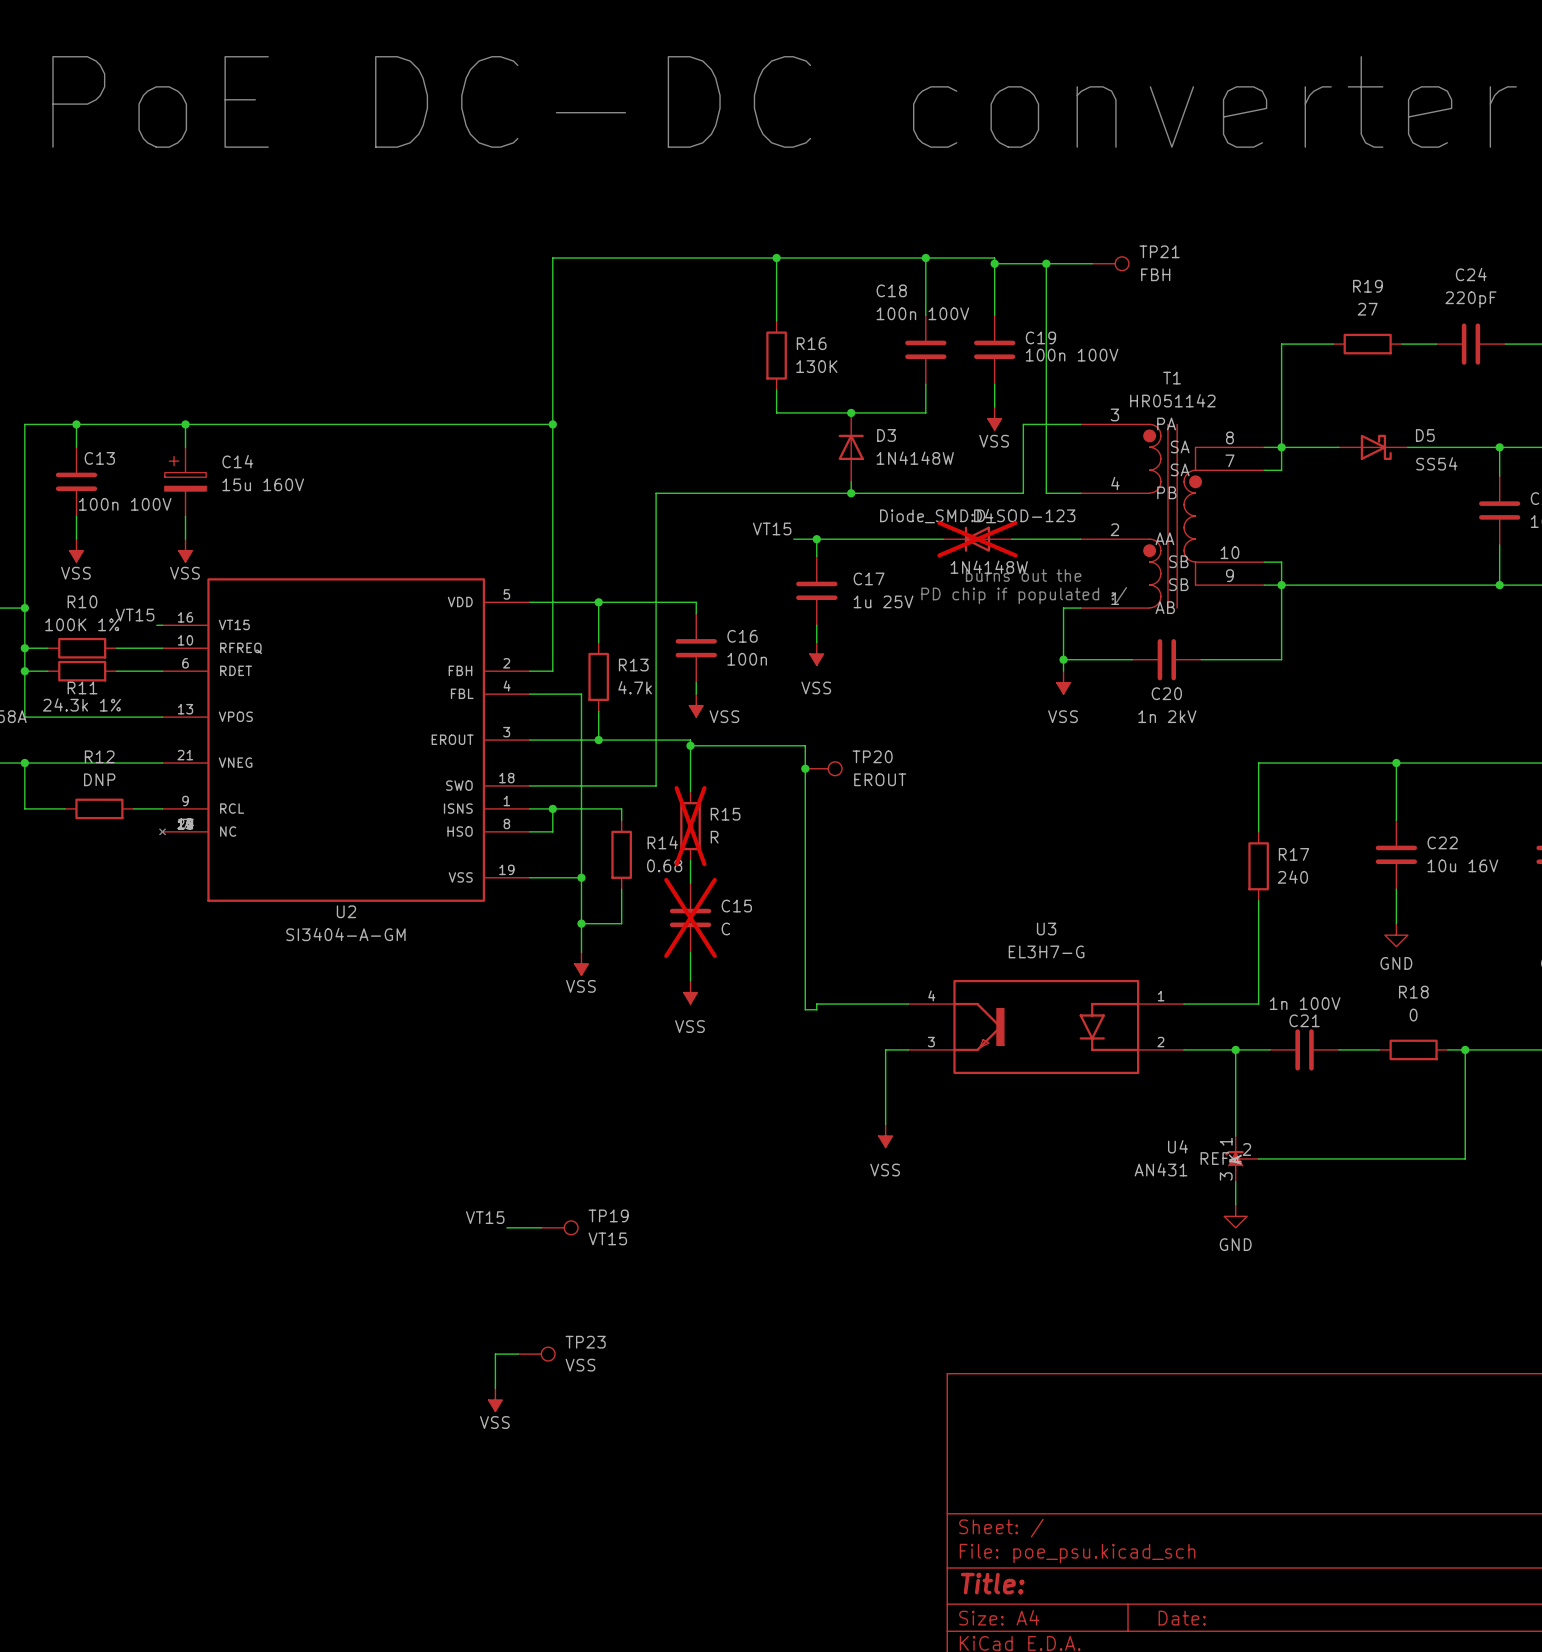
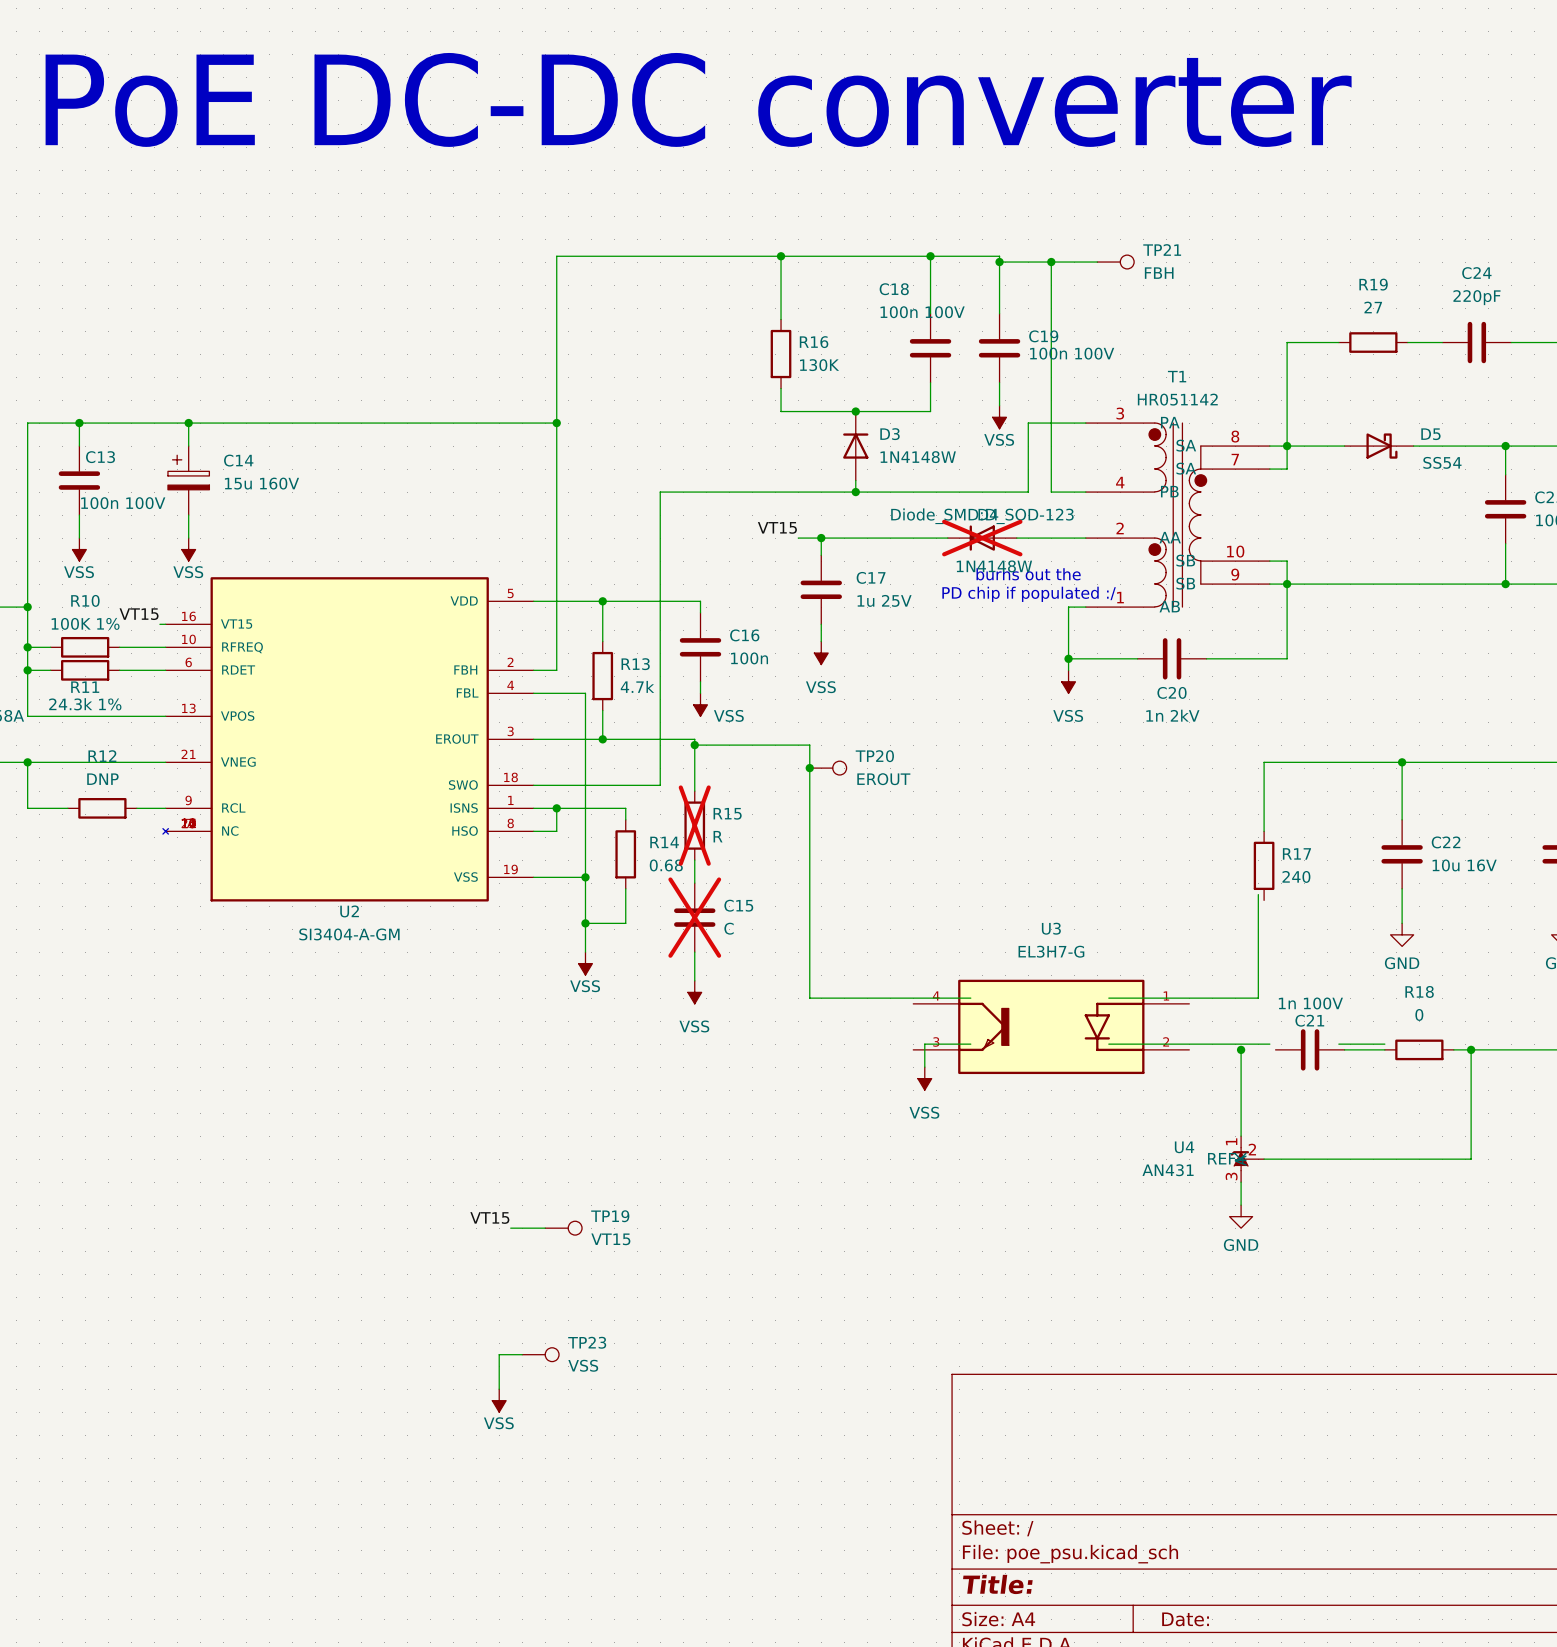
wire: none -> (1258, 894) (1258, 998) (1108, 998)
wire: (1258, 900) (1258, 1004) (1184, 1004) -> none
wire: (805, 998) (805, 1009) (816, 1009) (816, 1004) (908, 1004) -> (809, 998) (970, 998)
wire: none -> (970, 1044) (924, 1044) (924, 1067)
wire: none -> (1108, 1044) (1269, 1044)
wire: none -> (1338, 1044) (1384, 1044)
wire: (908, 1049) (885, 1049) (885, 1124) -> none
wire: (1184, 1049) (1270, 1049) -> none
power symbol position: VSS (885, 1136) -> VSS (924, 1078)

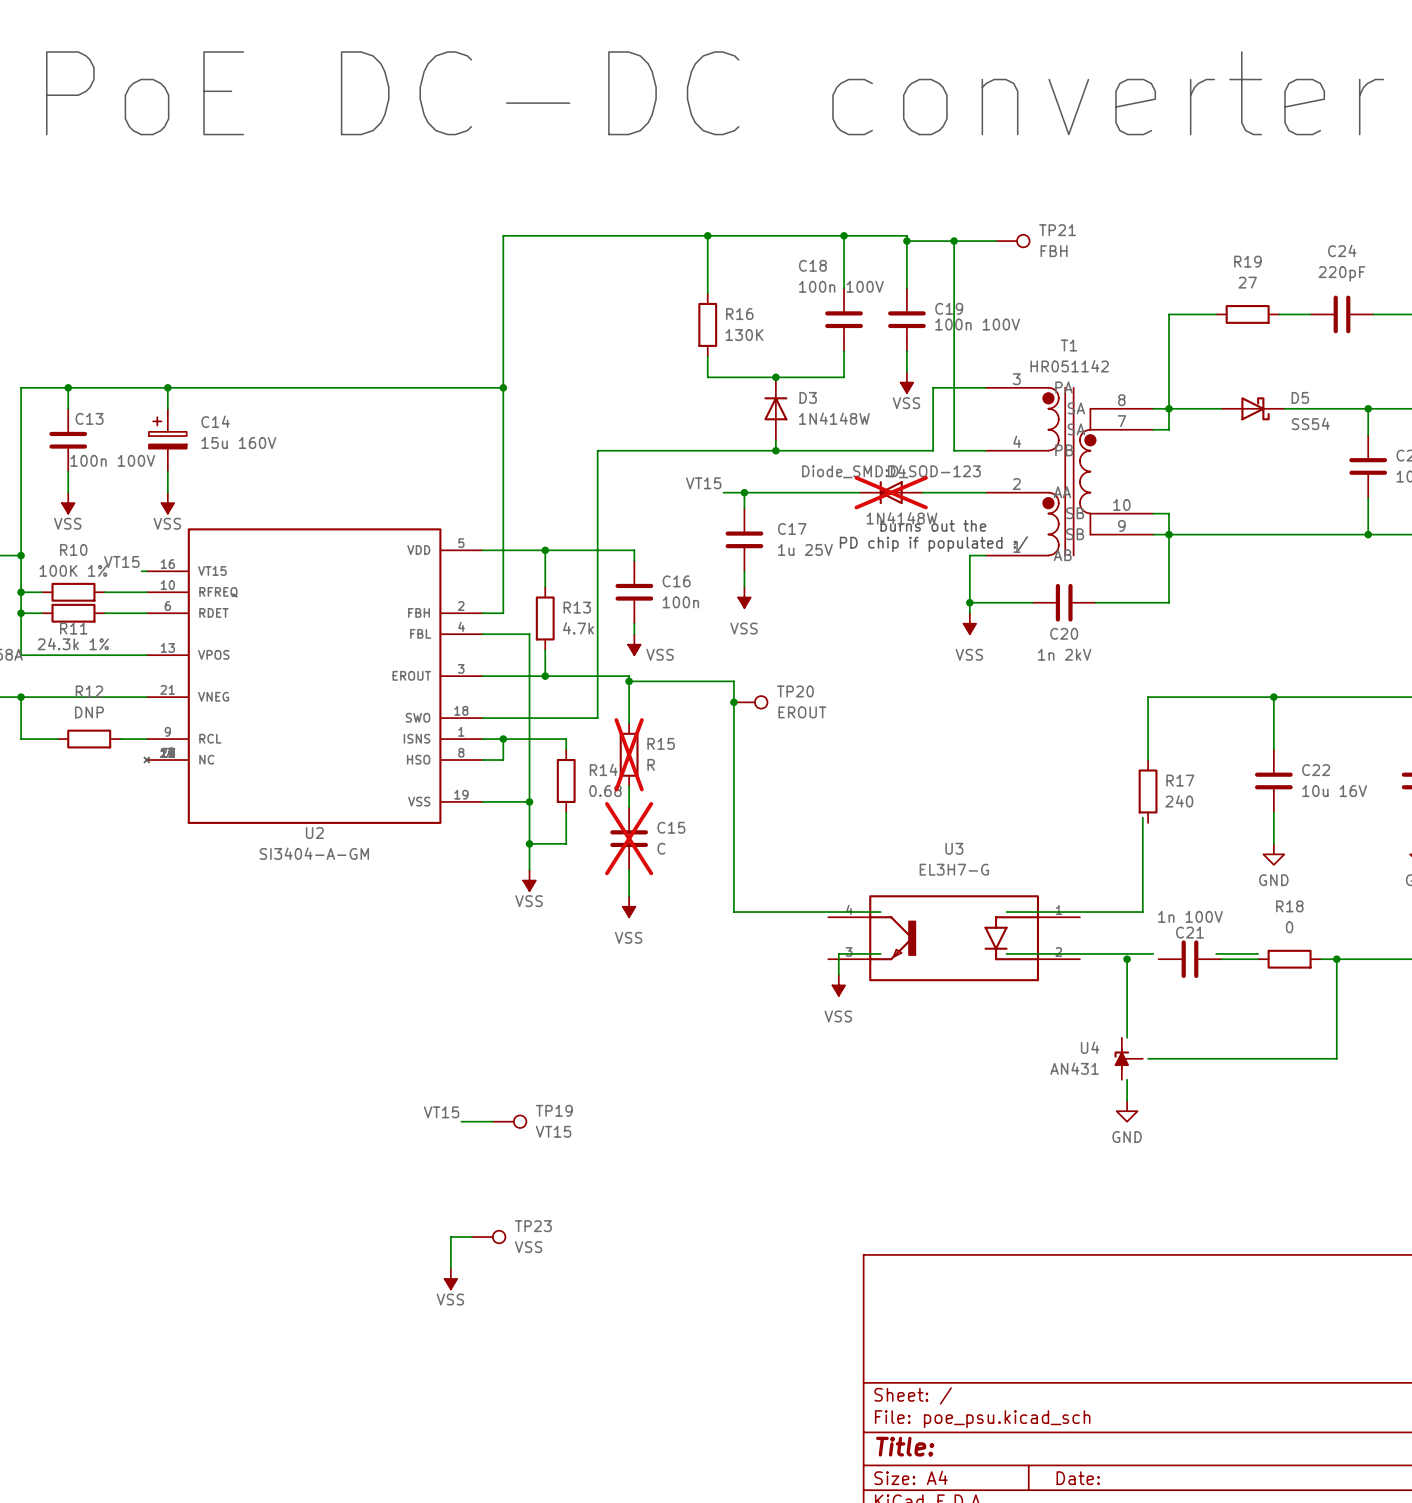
U4 symbol: [1230, 1136, 1265, 1183] -> [1114, 1037, 1143, 1080]
U4 name position: U4 (1184, 1147) -> U4 (1090, 1047)
U4 value position: AN431 (1168, 1170) -> AN431 (1074, 1068)

